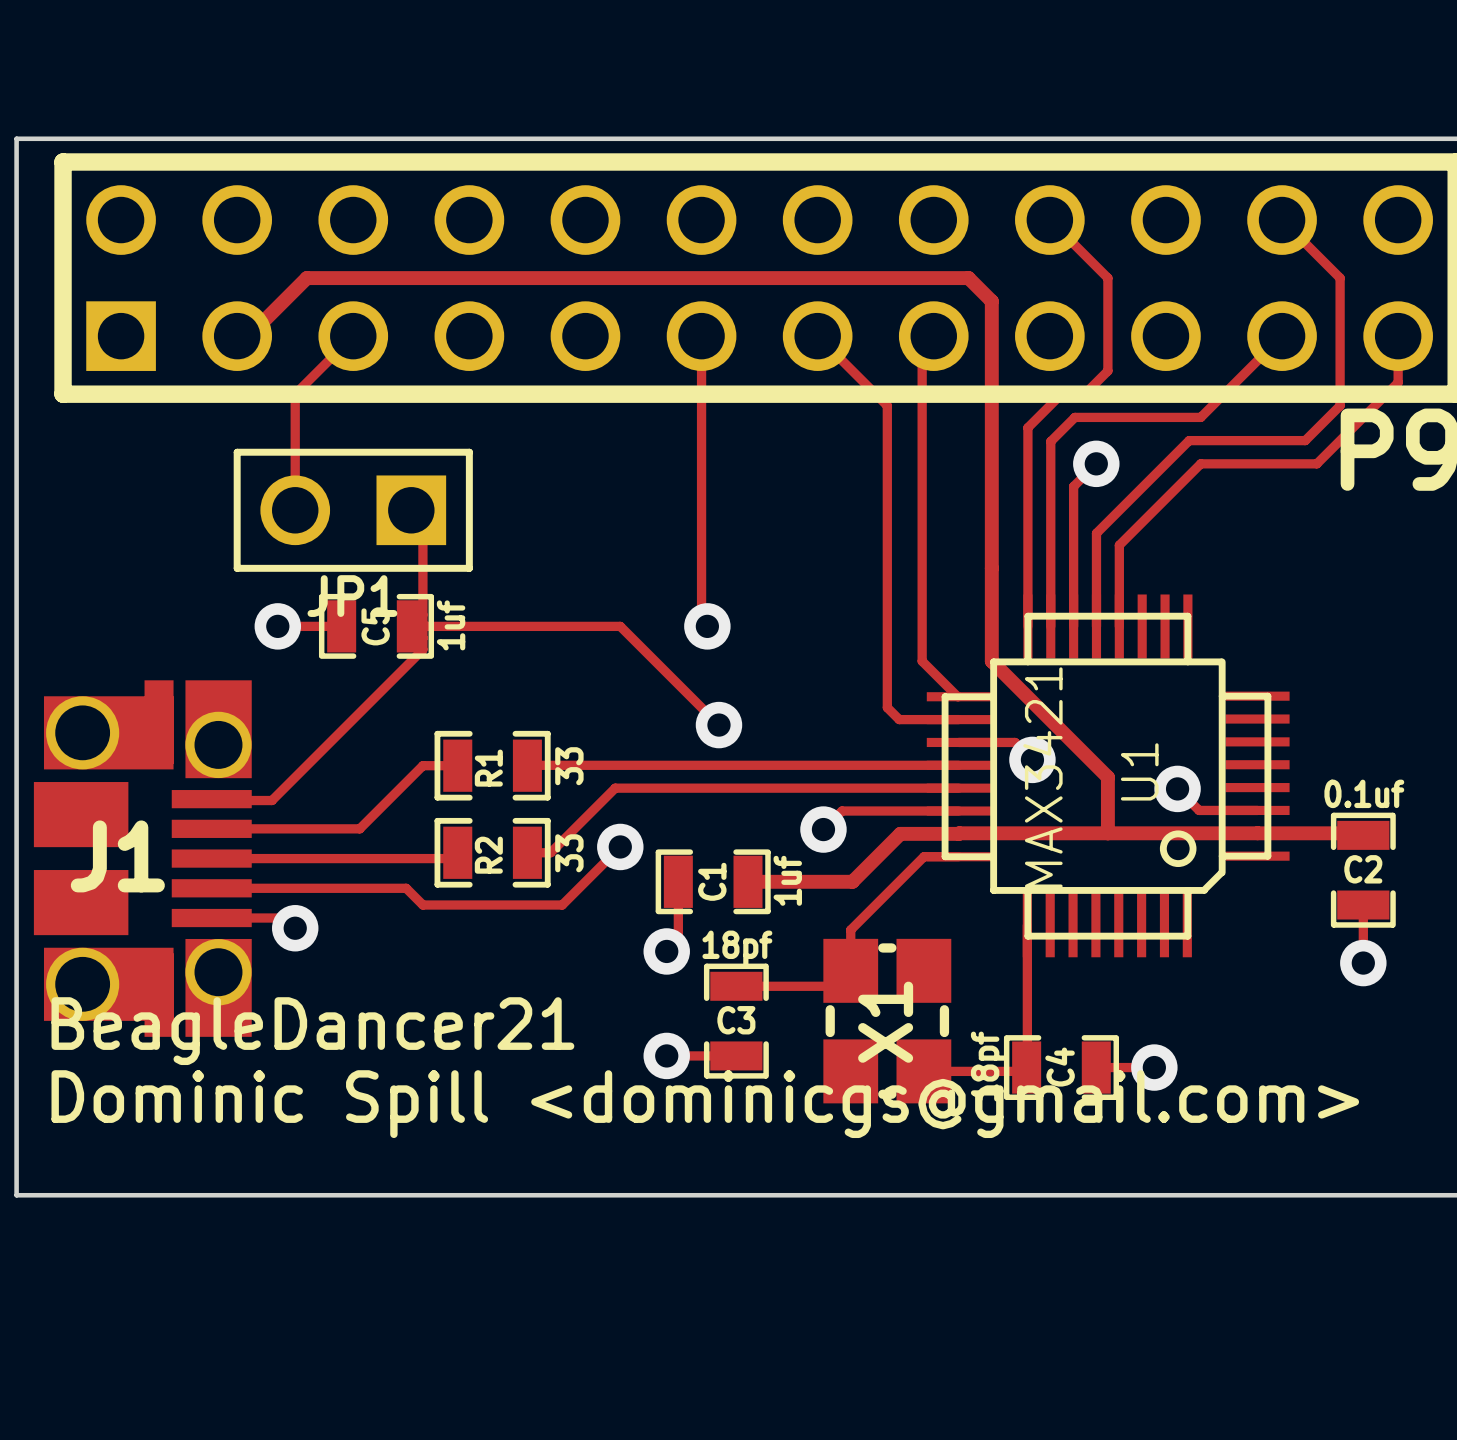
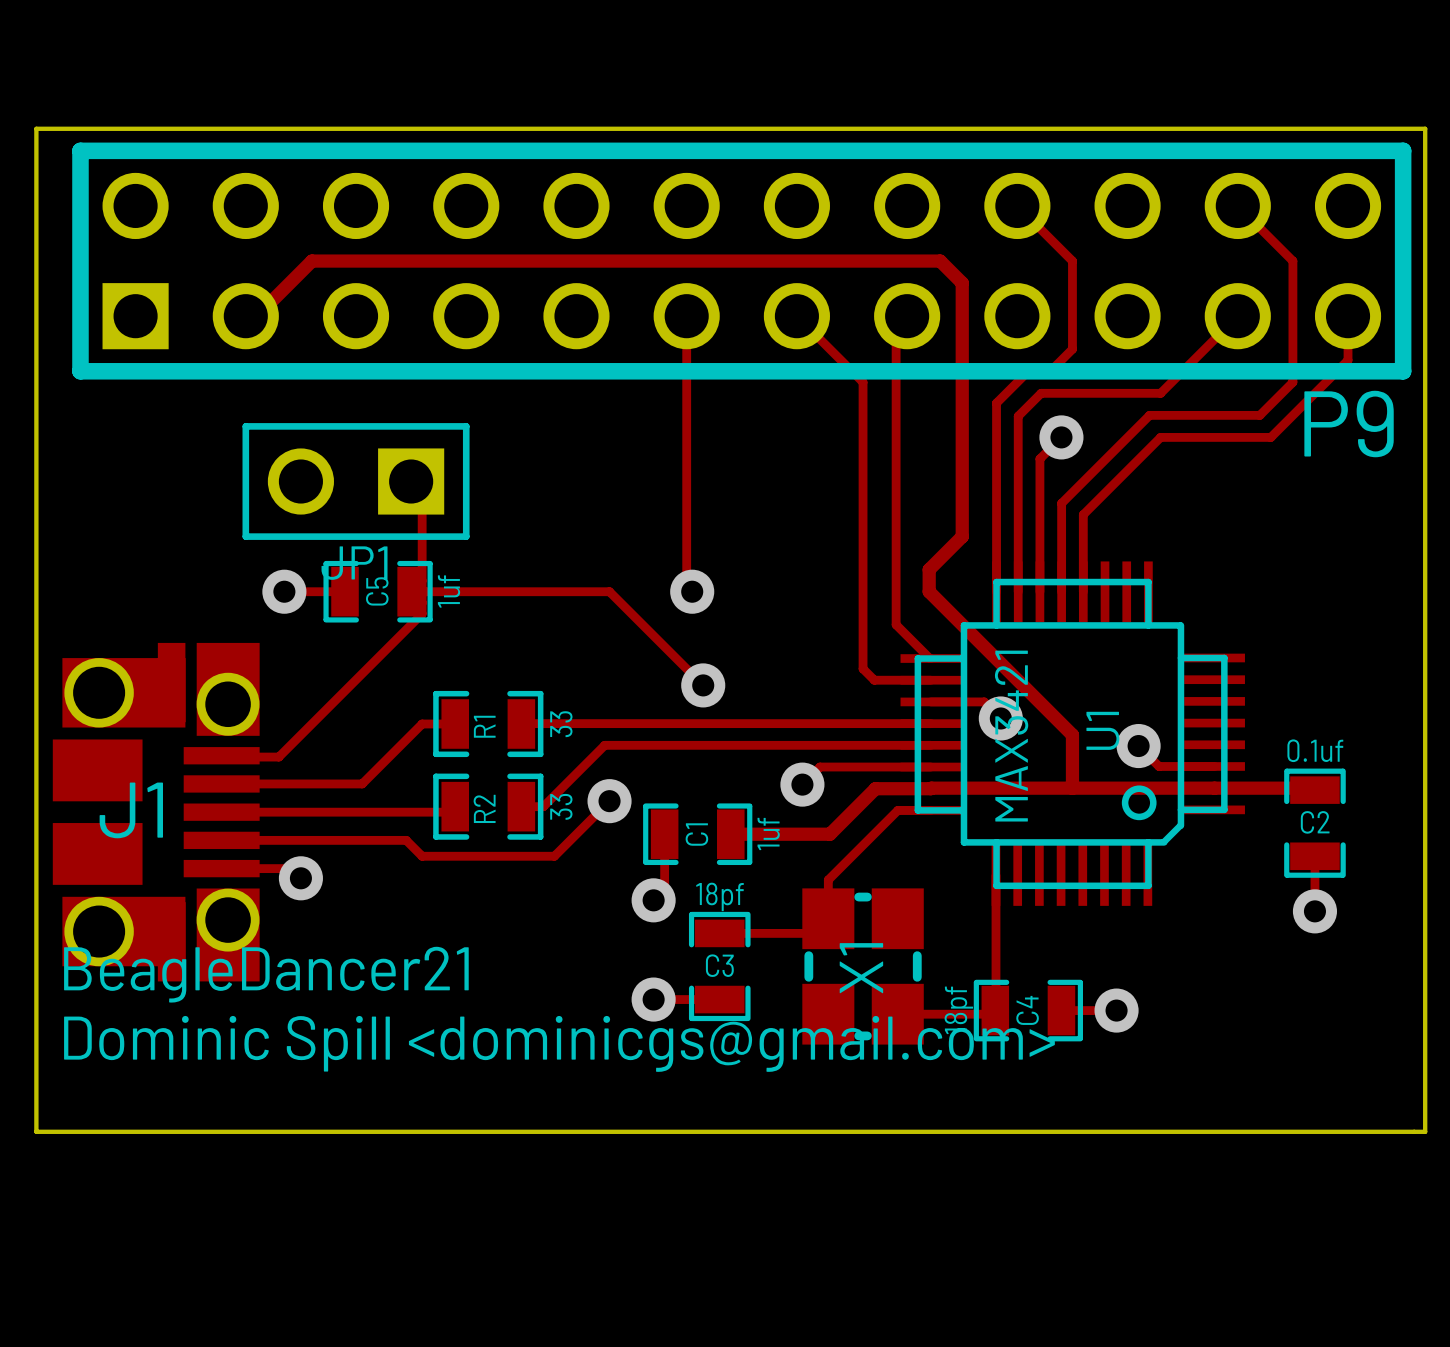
track: (353, 336) (295, 394) (295, 510) -> none
track: (991, 568) (991, 661) -> (962, 536) (929, 569) (929, 591) (962, 624)

